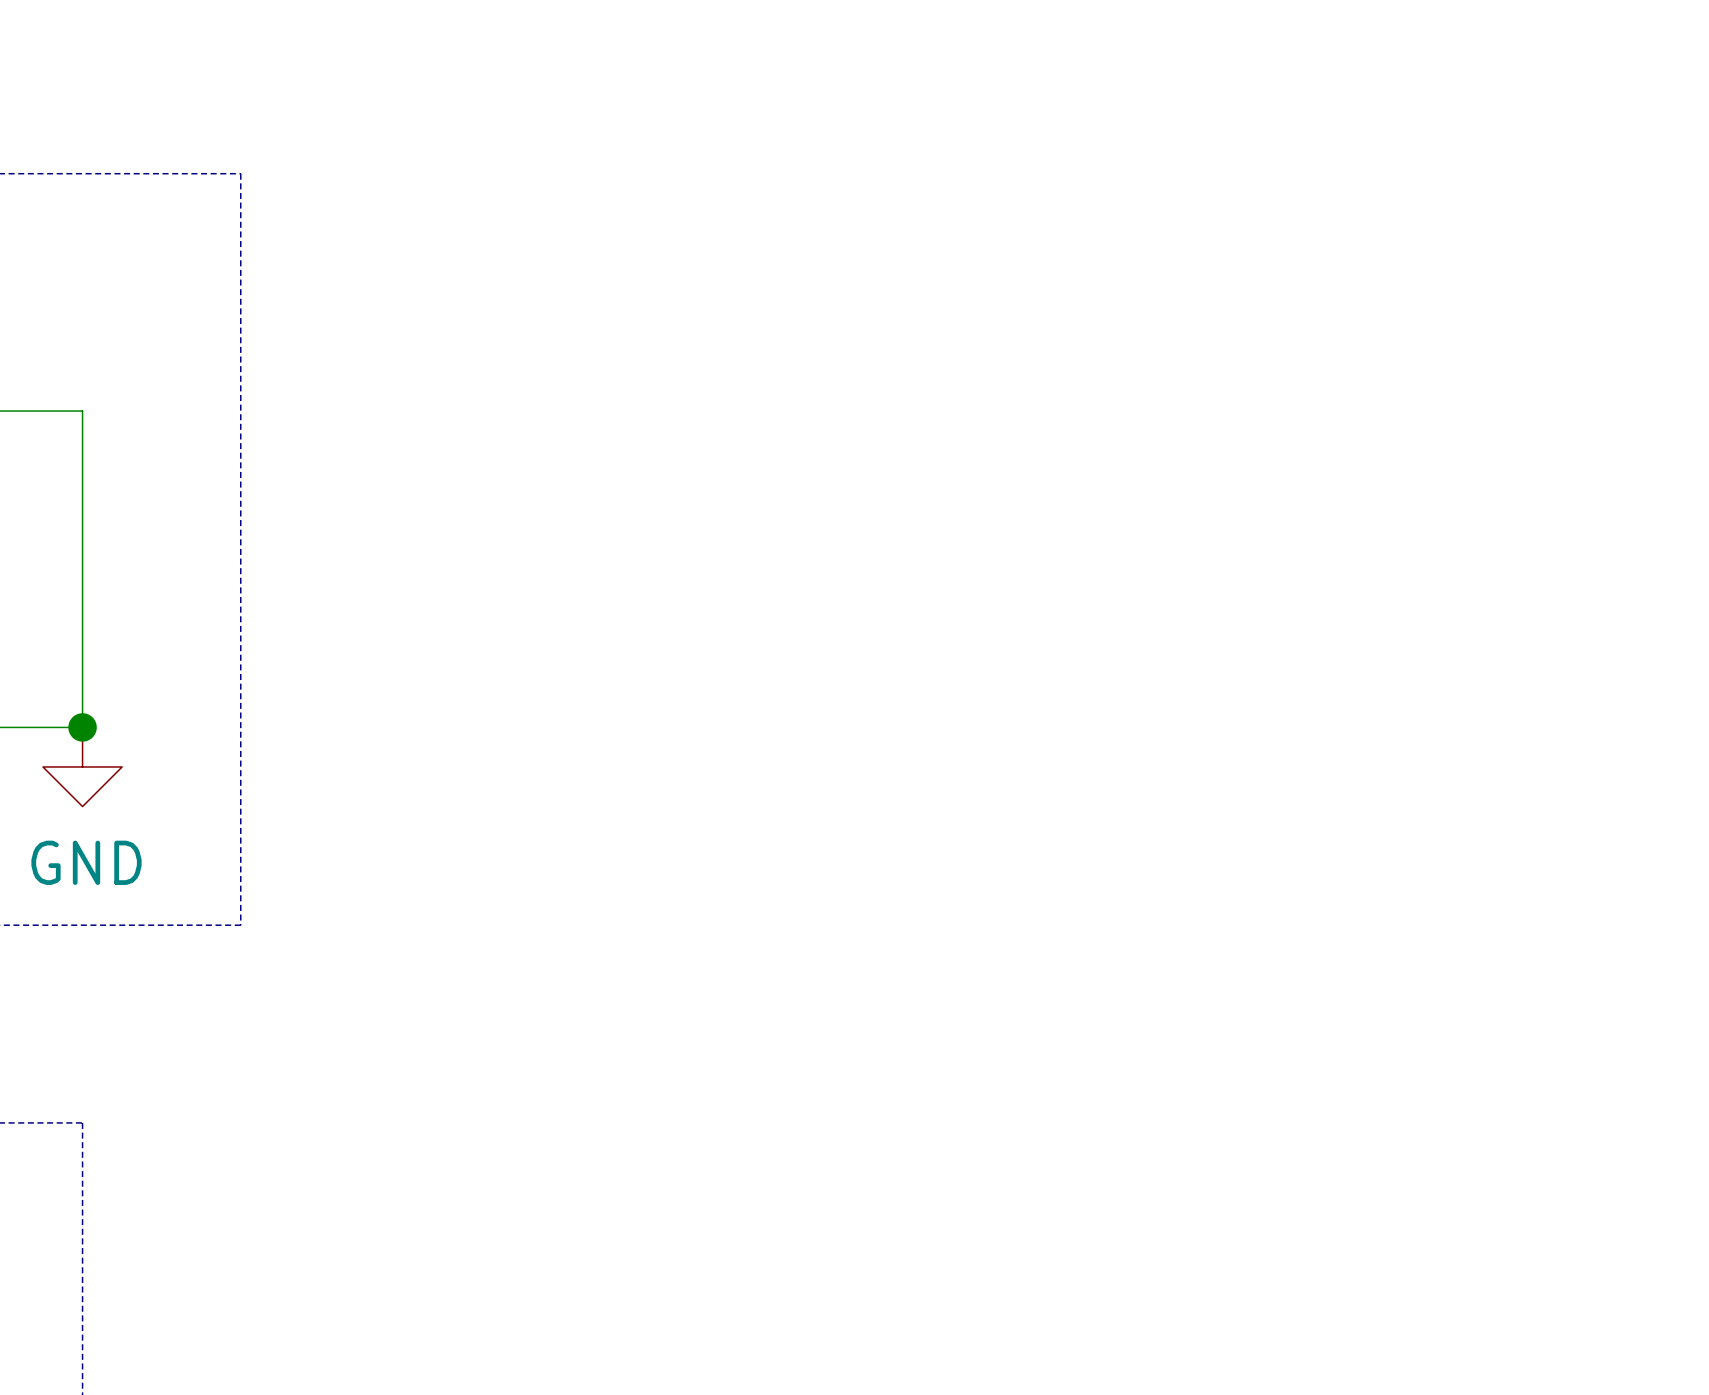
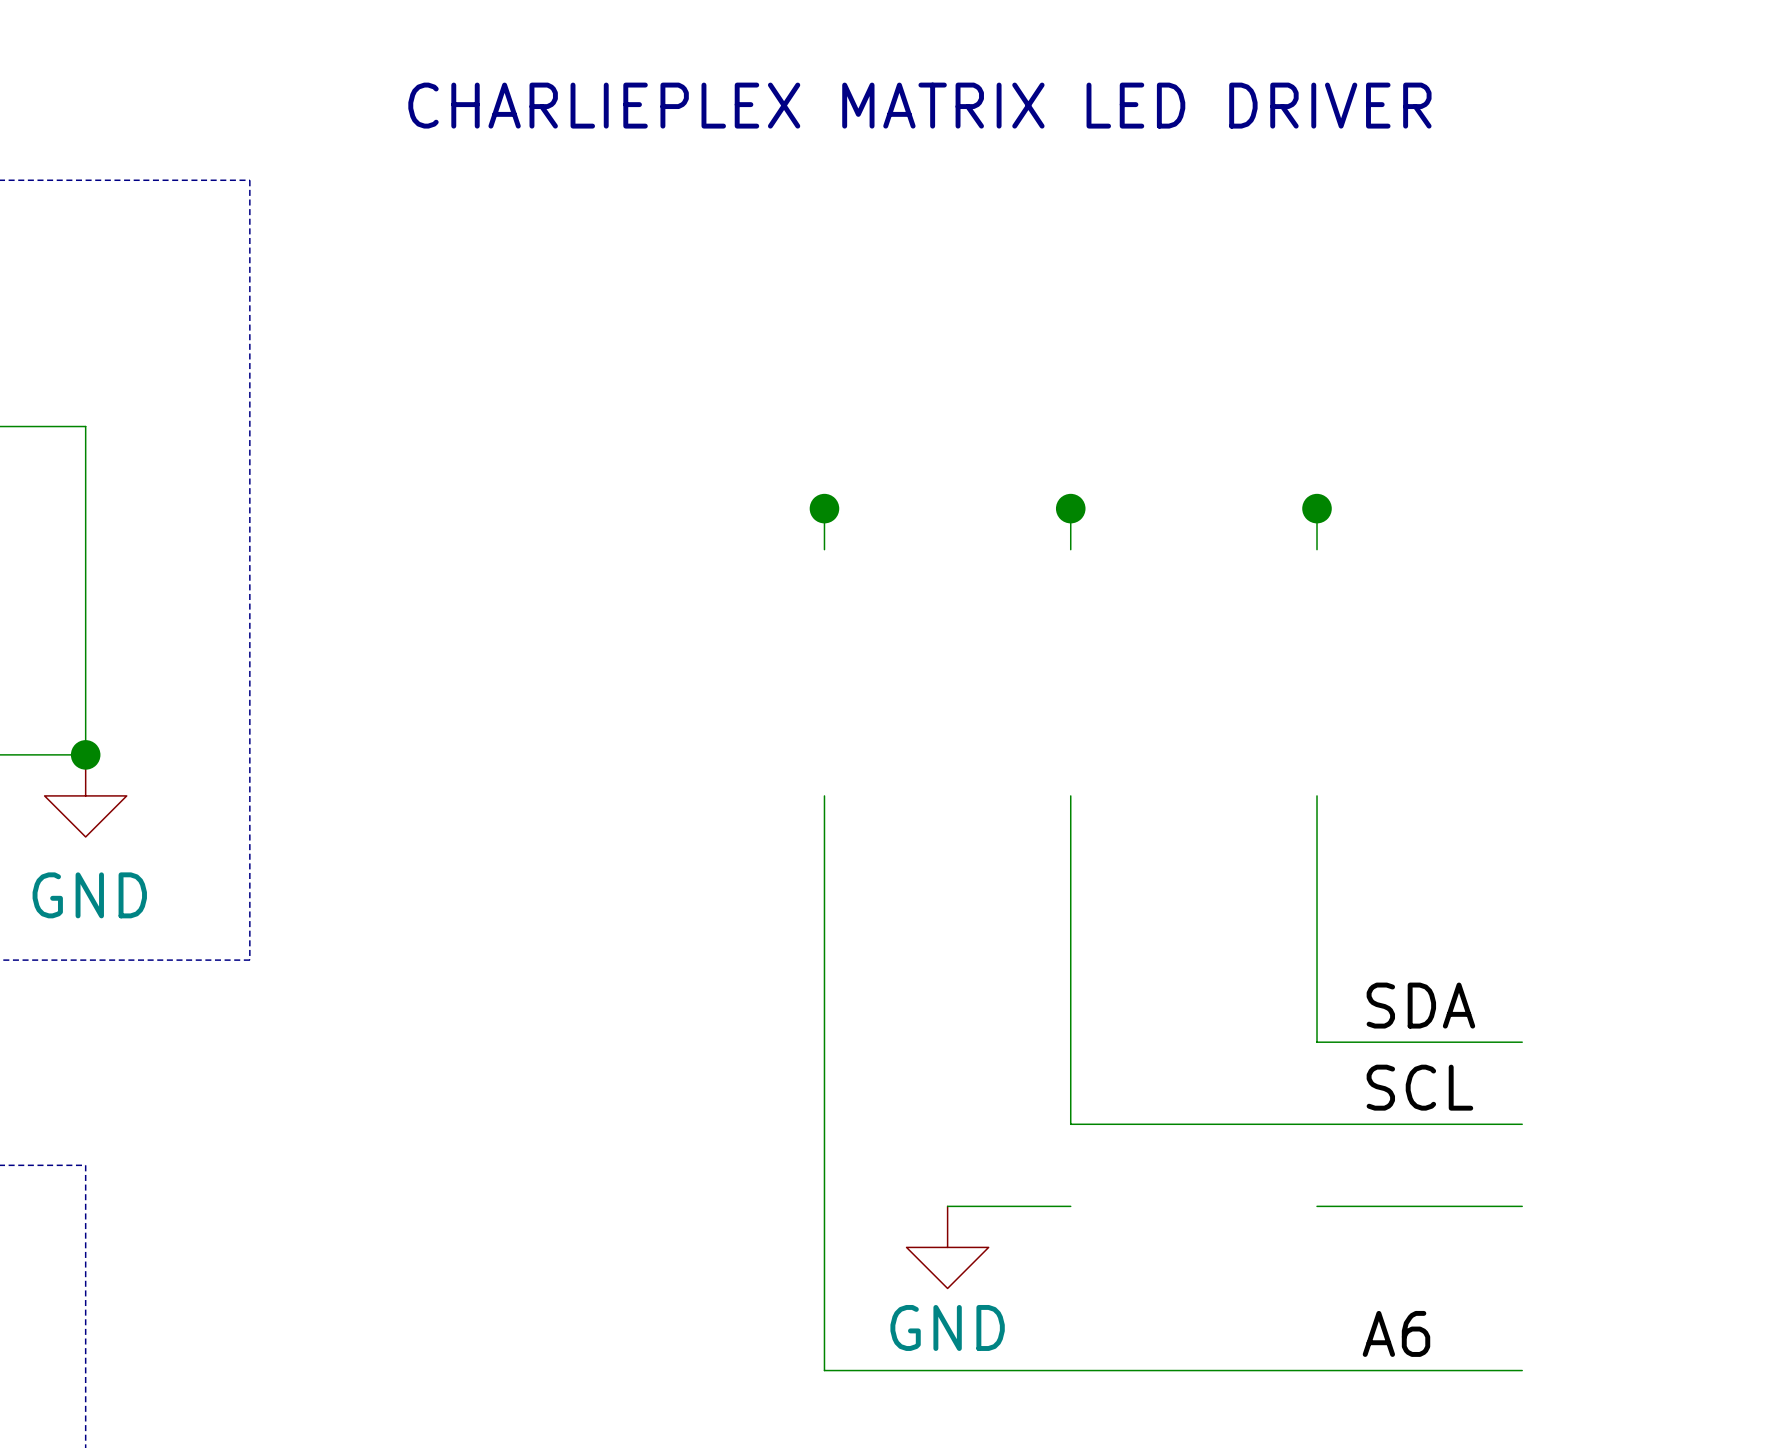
text: none -> CHARLIEPLEX MATRIX LED DRIVER (919, 105)
wire: none -> (824, 508) (824, 549)
junction: none -> (824, 508)
wire: none -> (1070, 508) (1070, 549)
junction: none -> (1070, 508)
wire: none -> (1317, 508) (1317, 549)
junction: none -> (1317, 508)
wire: none -> (824, 795) (824, 1370) (1522, 1370)
wire: none -> (1070, 795) (1070, 1124) (1522, 1124)
wire: none -> (1317, 795) (1317, 1042) (1522, 1042)
label: none -> SDA (1420, 1005)
label: none -> SCL (1419, 1087)
wire: none -> (947, 1206) (1070, 1206)
wire: none -> (1317, 1206) (1522, 1206)
power symbol: none -> GND (947, 1247)
label: none -> A6 (1396, 1333)

